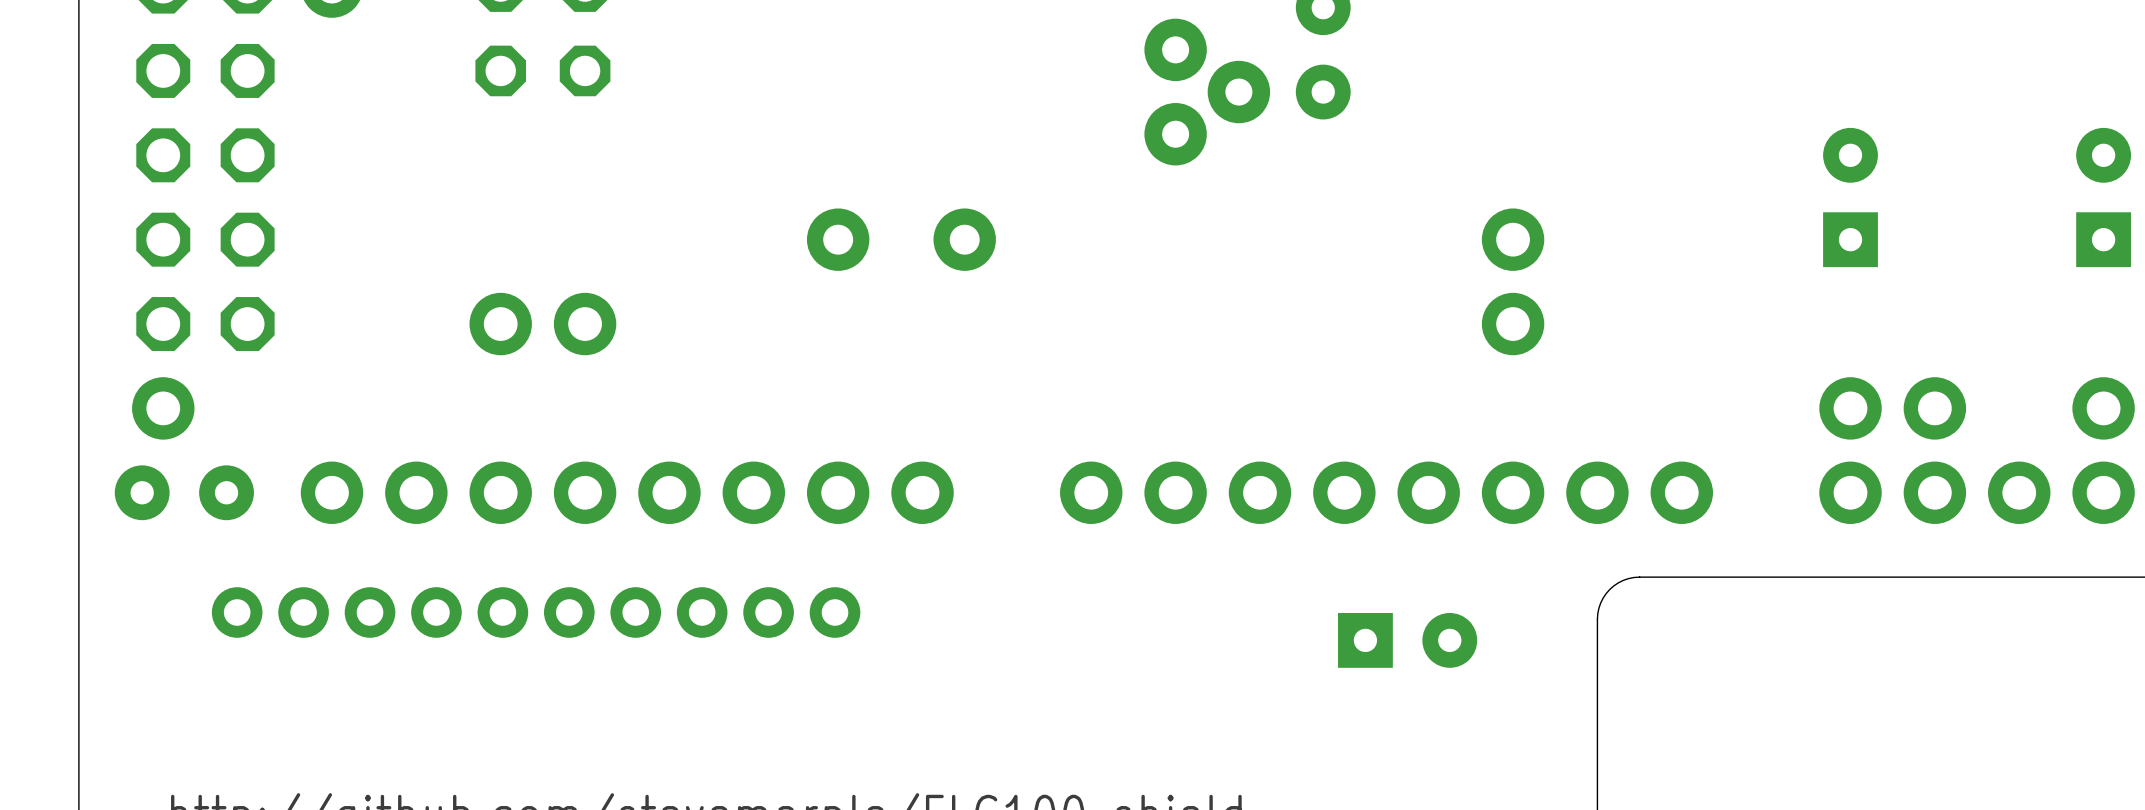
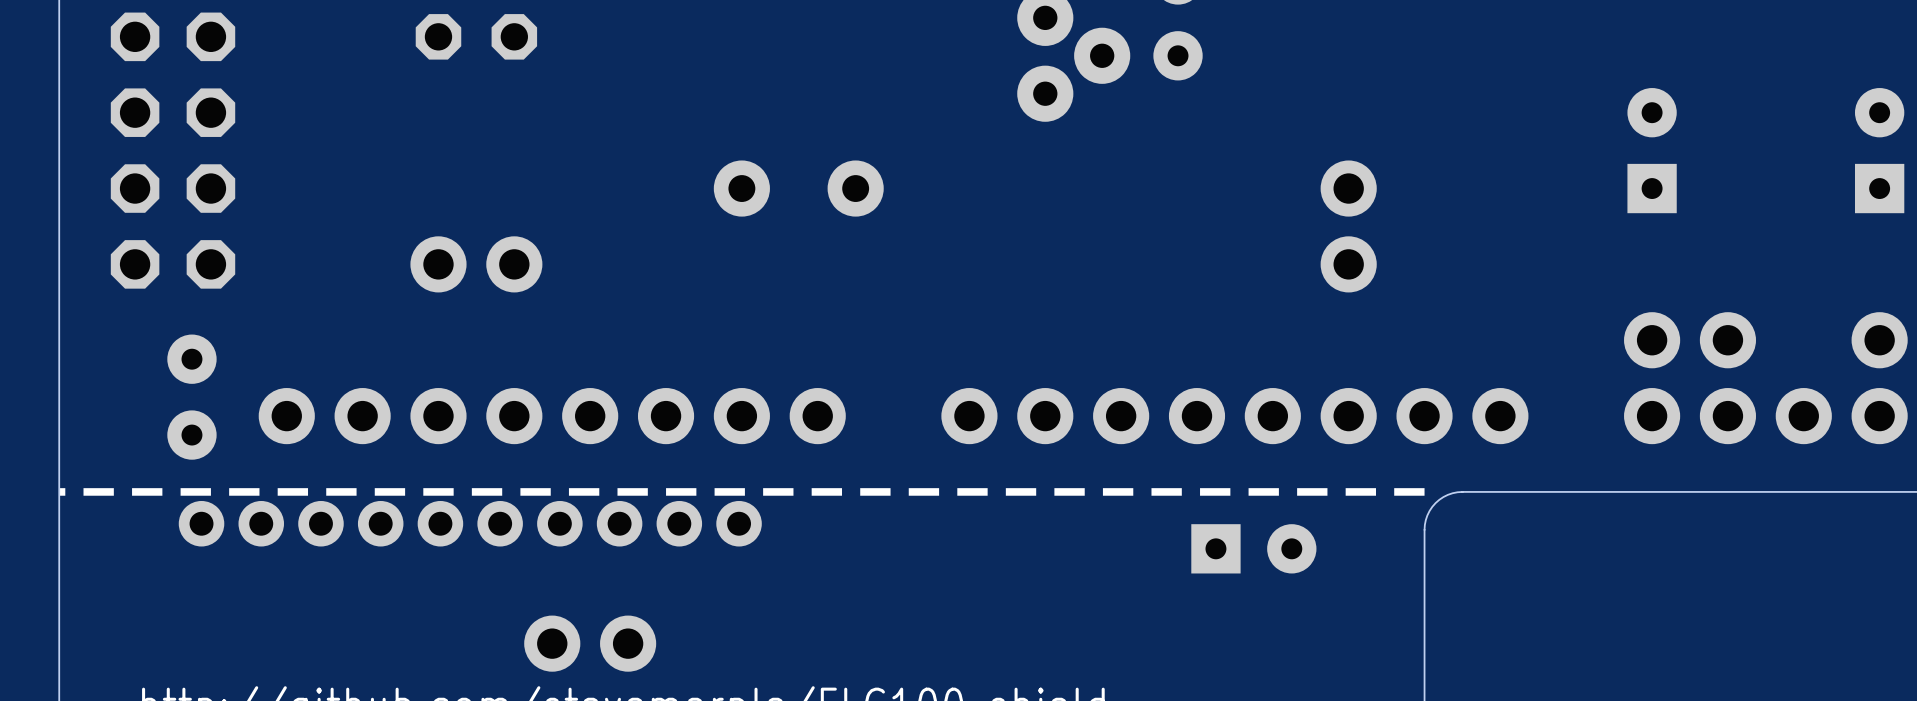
part: (163, 408) -> none
part rotation: 0° (184, 492) -> 90° clockwise (191, 397)
line: none -> (1424, 491) (59, 491)
part: none -> (552, 643)
part: none -> (628, 643)

